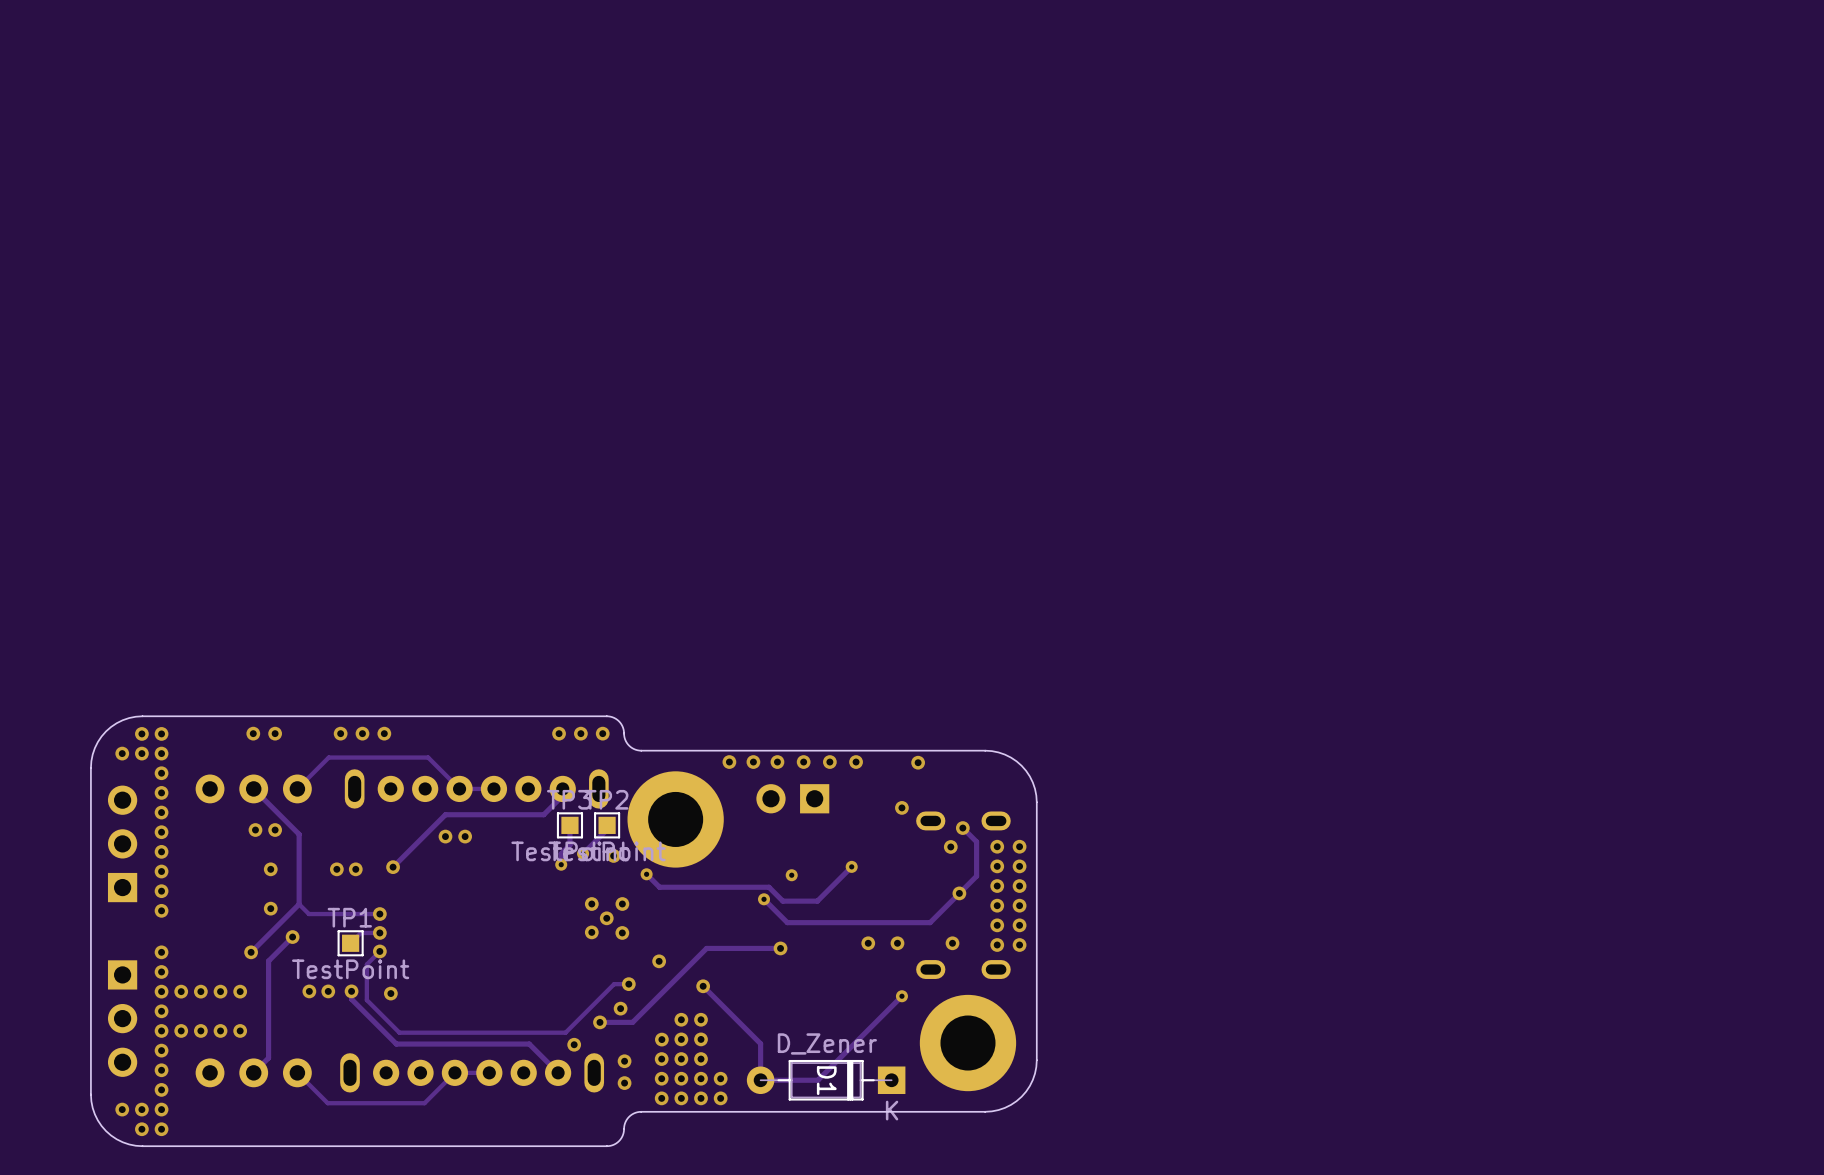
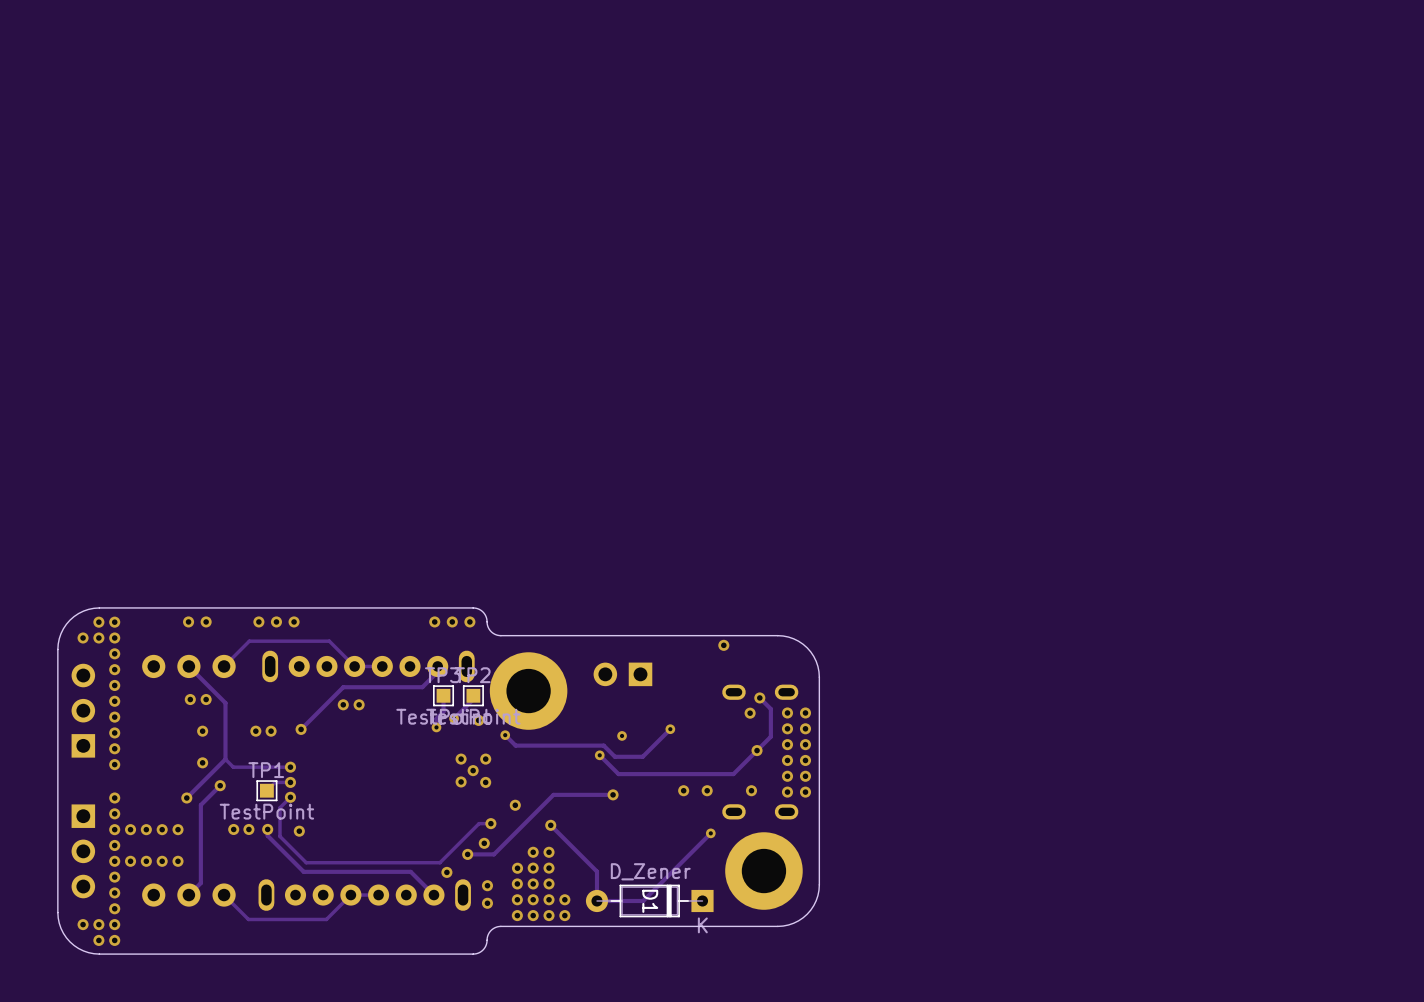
via: (729, 762) -> none
via: (753, 762) -> none
via: (777, 762) -> none
via: (803, 762) -> none
via: (829, 762) -> none
via: (856, 762) -> none
via: (901, 807) -> none

